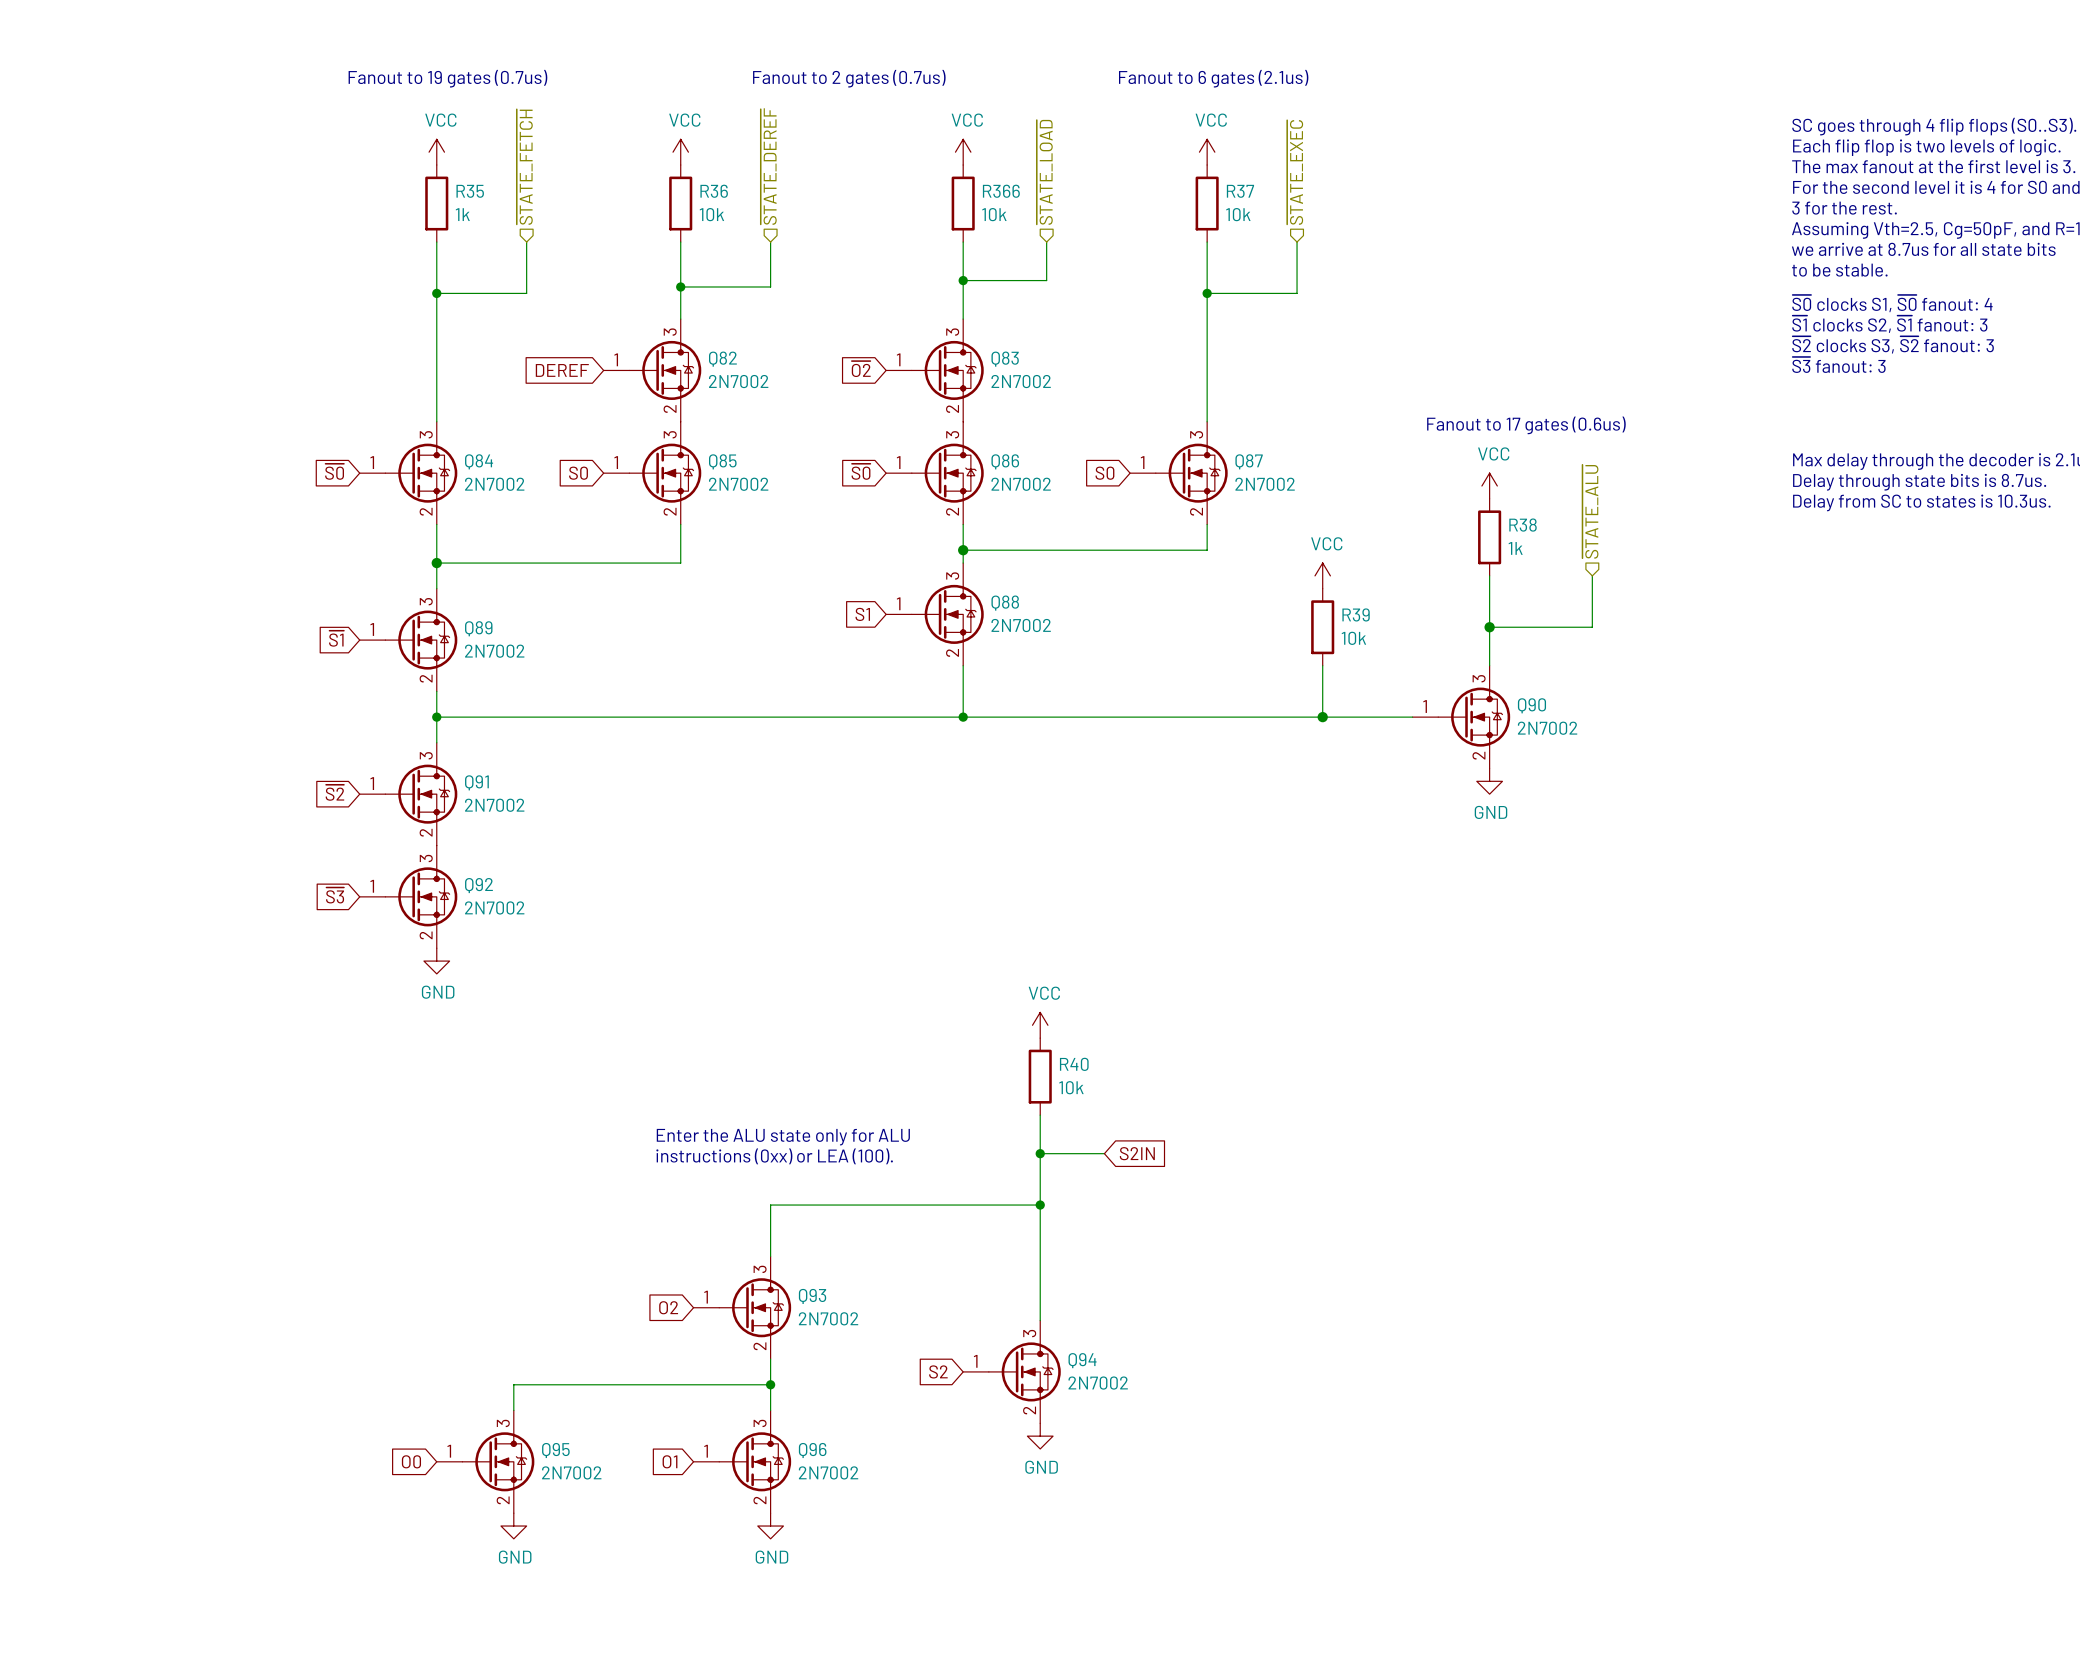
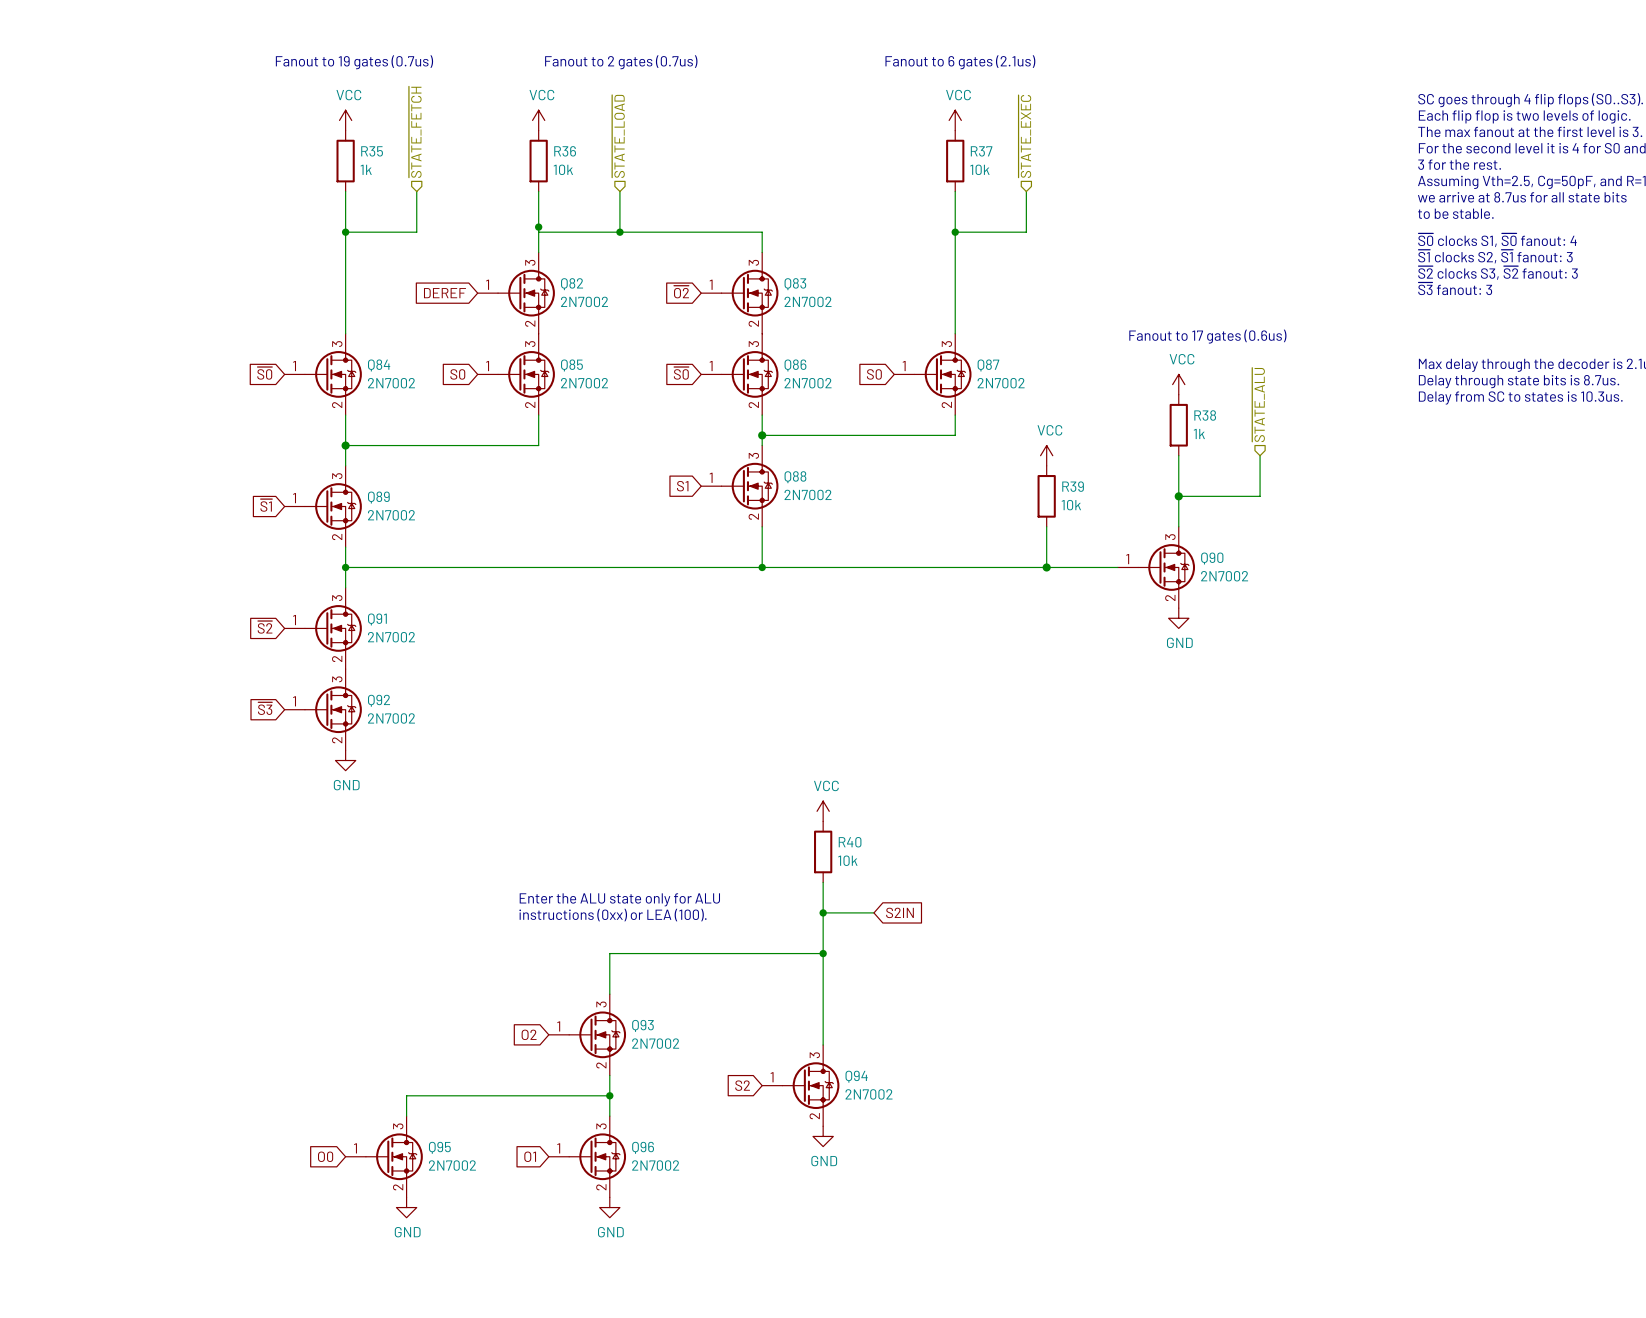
text position: Fanout to 2 gates (0.7us) (849, 78) -> Fanout to 2 gates (0.7us) (621, 62)
power symbol: VCC (963, 152) -> none
hierarchical label: ~{STATE_DEREF} (768, 166) -> ~{STATE_LOAD} (618, 136)
hierarchical label: ~{STATE_LOAD} (1044, 172) -> none
R366: 10k (963, 203) -> none
wire: (770, 242) (770, 286) (680, 286) -> none
wire: none -> (619, 191) (619, 232)
wire: (963, 242) (963, 293) -> (538, 232) (762, 232)
wire: (1046, 242) (1046, 280) (963, 280) -> none
junction: (963, 280) -> none
junction: none -> (619, 232)

